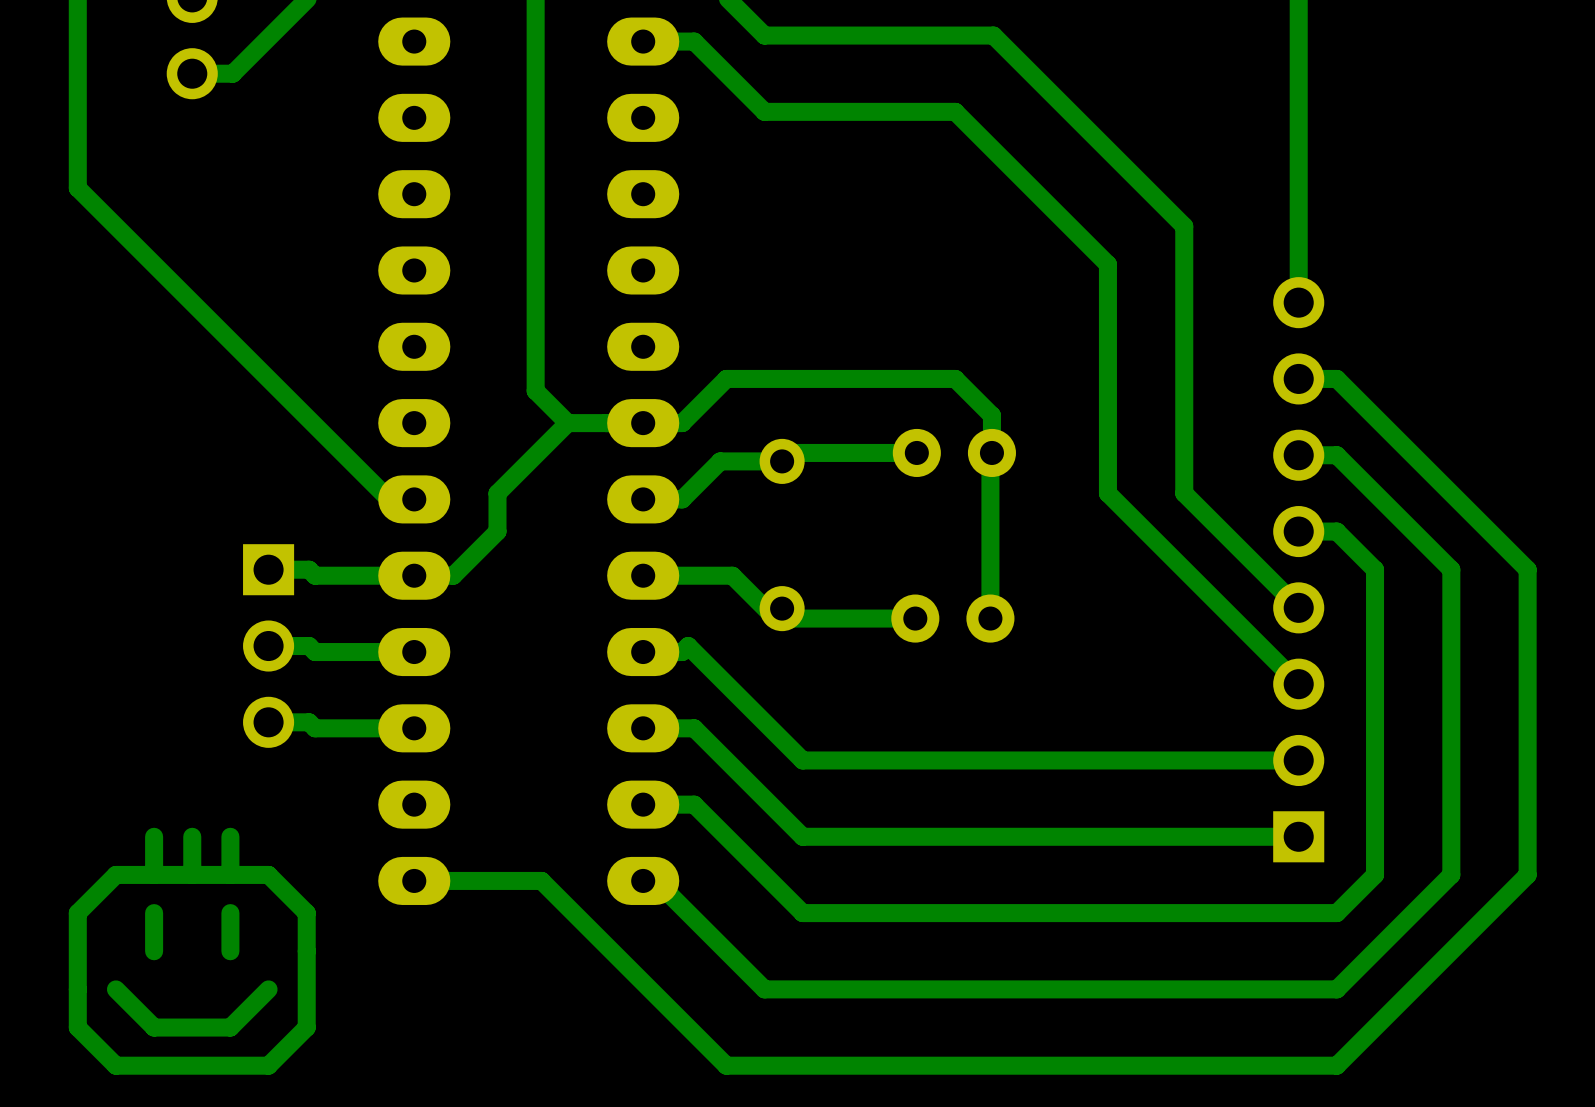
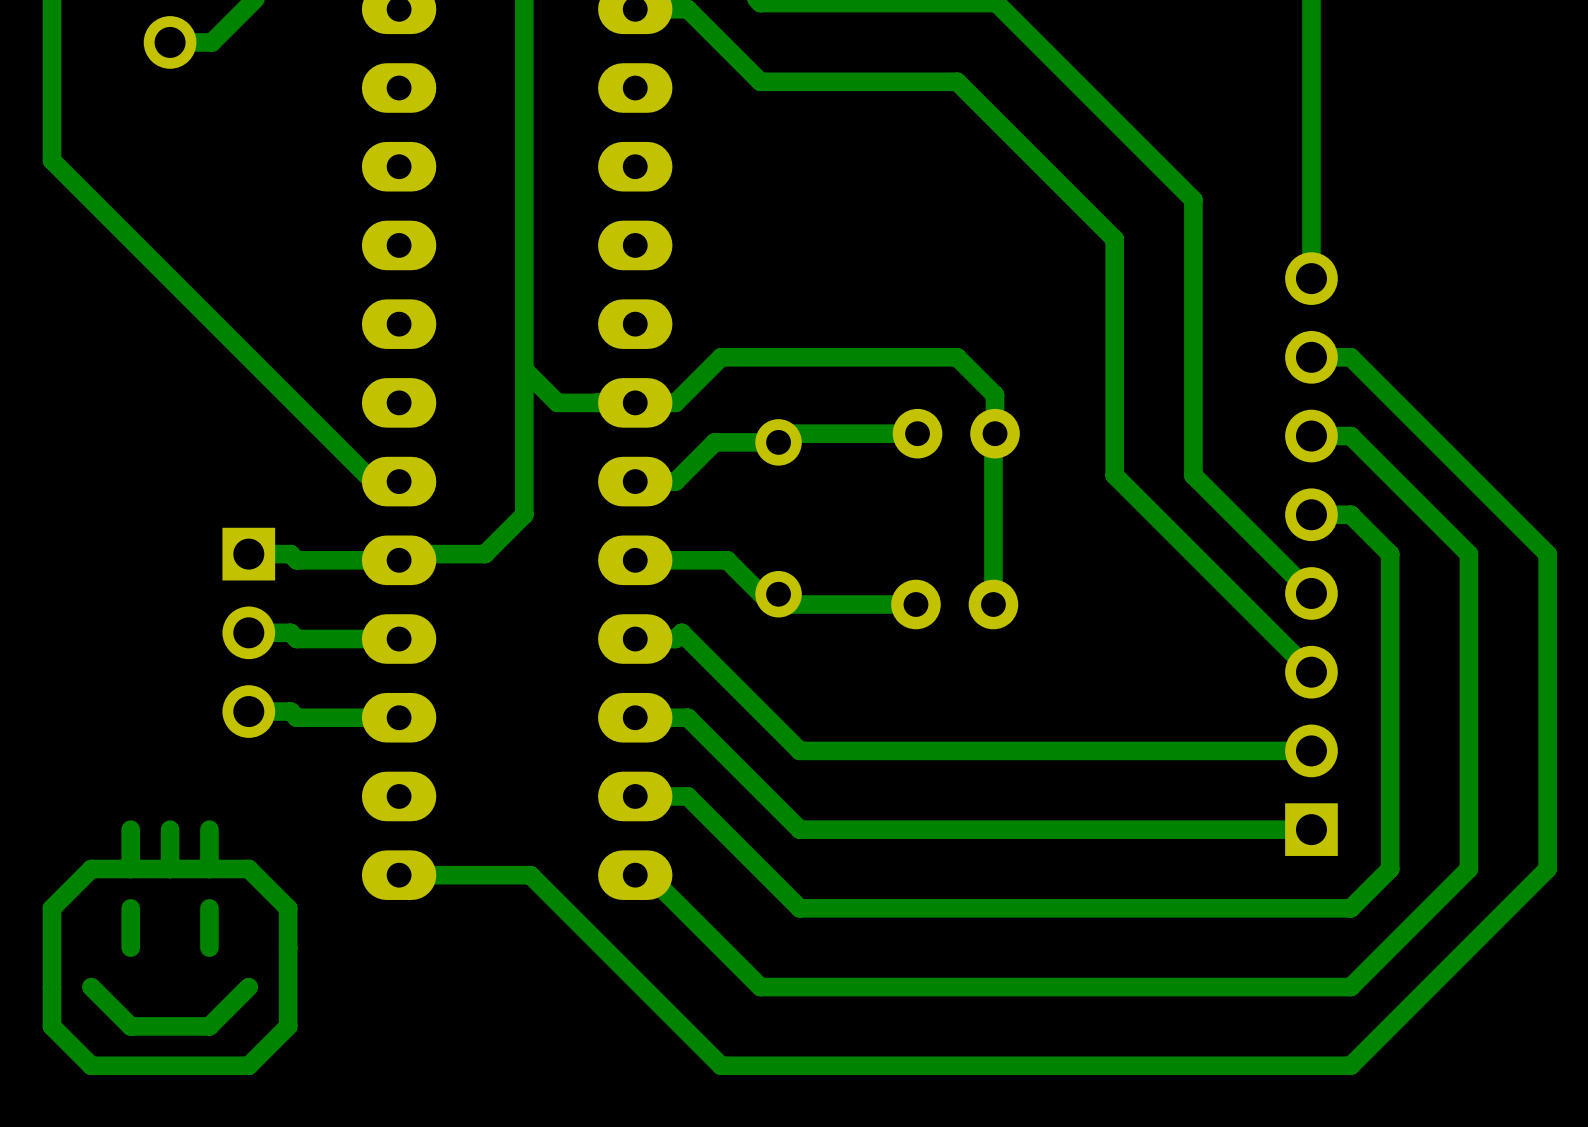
track: (567, 423) (497, 493) (497, 531) (453, 575) (415, 575) -> (524, 369) (524, 514) (484, 554) (406, 554) (400, 560)

